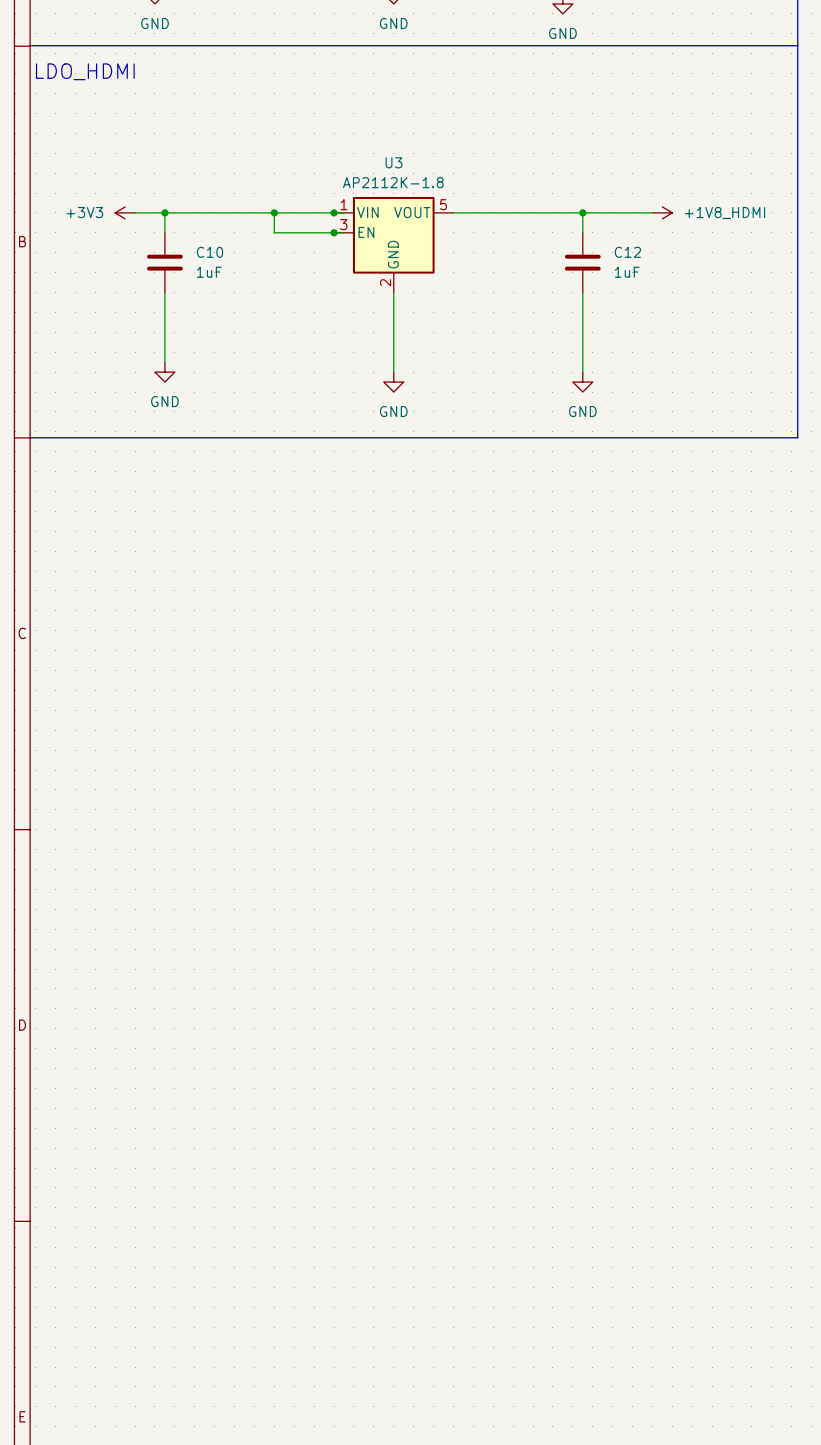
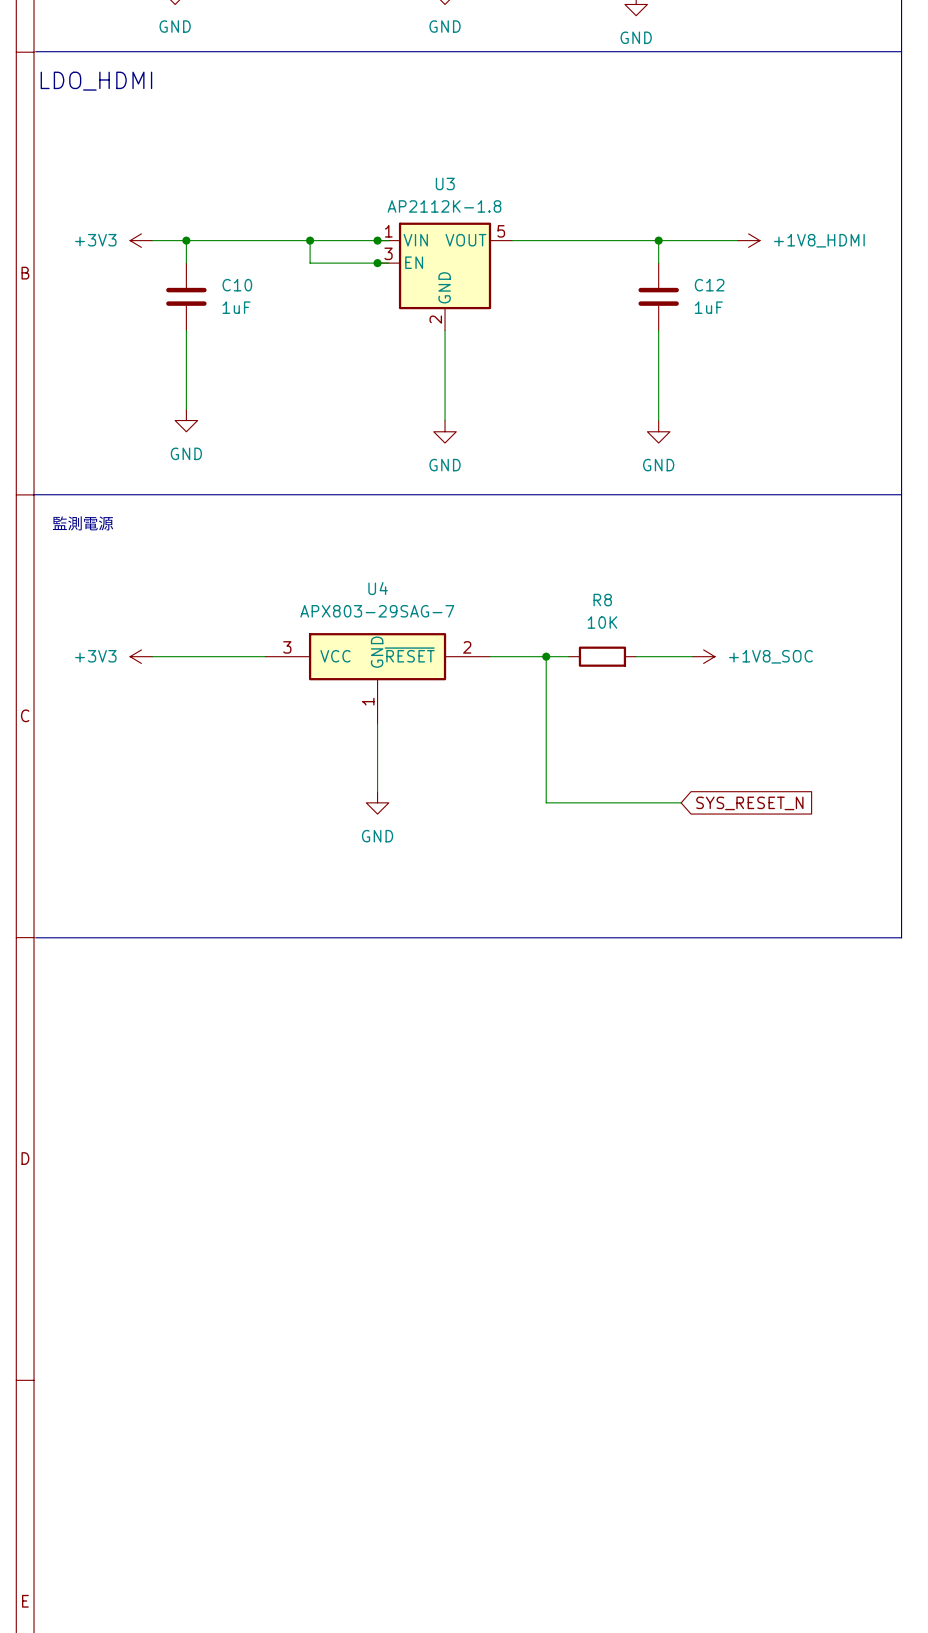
line: none -> (901, 494) (901, 937) (35, 937)
text: none -> 監測電源 (83, 523)
power symbol: none -> +3V3 (141, 656)
wire: none -> (152, 656) (265, 656)
wire: none -> (490, 656) (568, 656)
wire: none -> (546, 656) (546, 802) (681, 802)
junction: none -> (546, 656)
R8: none -> 10K (602, 656)
wire: none -> (636, 656) (692, 656)
power symbol: none -> +1V8_SOC (703, 656)
U4: none -> APX803-29SAG-7 (377, 678)
wire: none -> (377, 724) (377, 791)
power symbol: none -> GND (377, 802)
global label: none -> SYS_RESET_N (749, 803)

